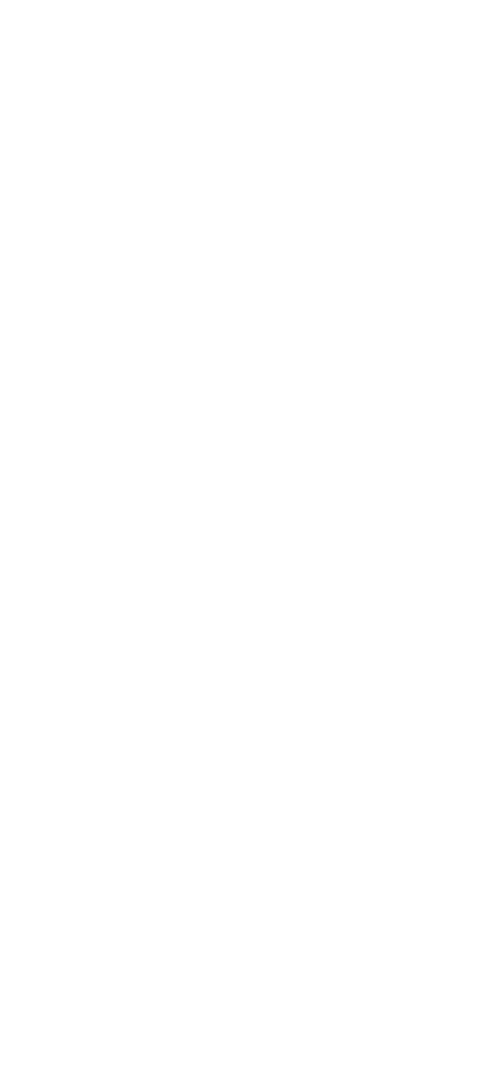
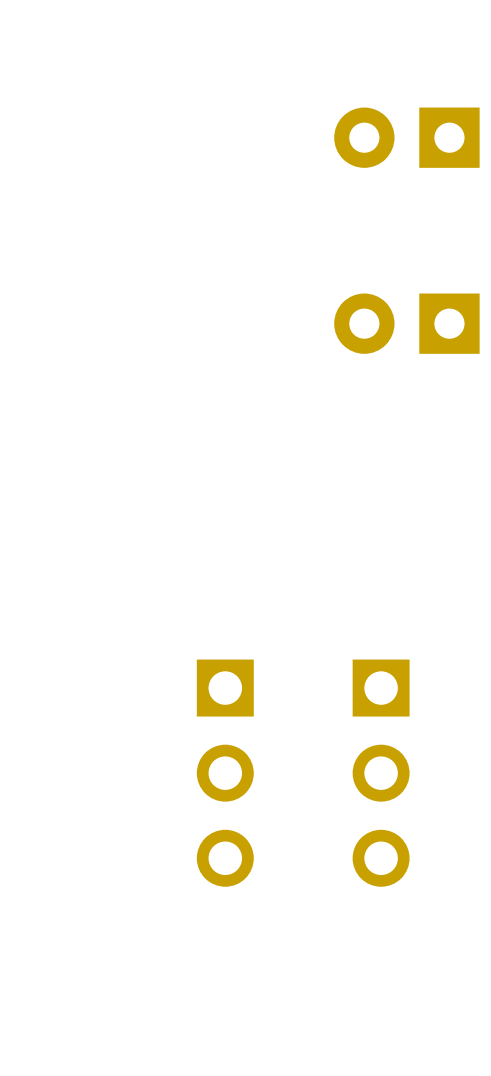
part: none -> (406, 137)
part: none -> (406, 323)
part: none -> (225, 773)
part: none -> (381, 773)

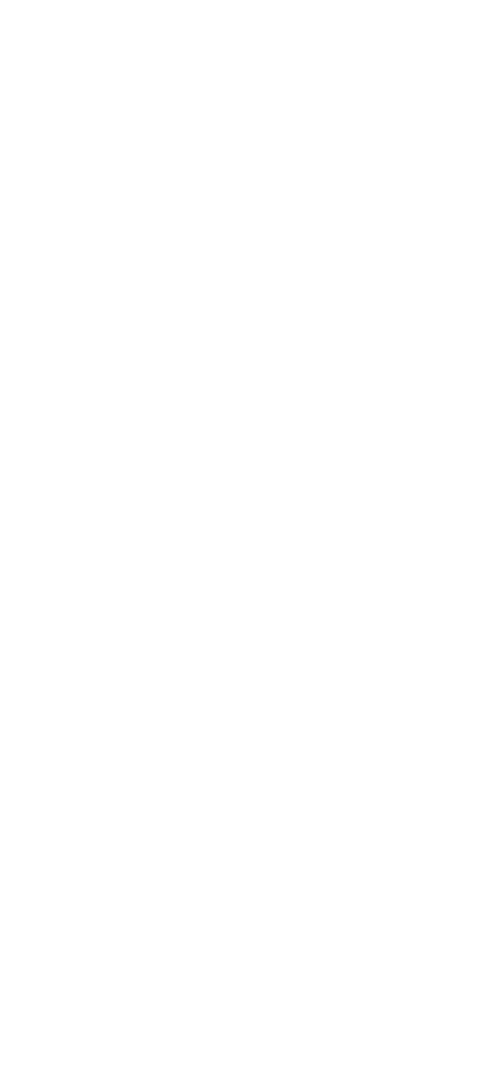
part: (406, 137) -> none
part: (406, 323) -> none
part: (225, 773) -> none
part: (381, 773) -> none

